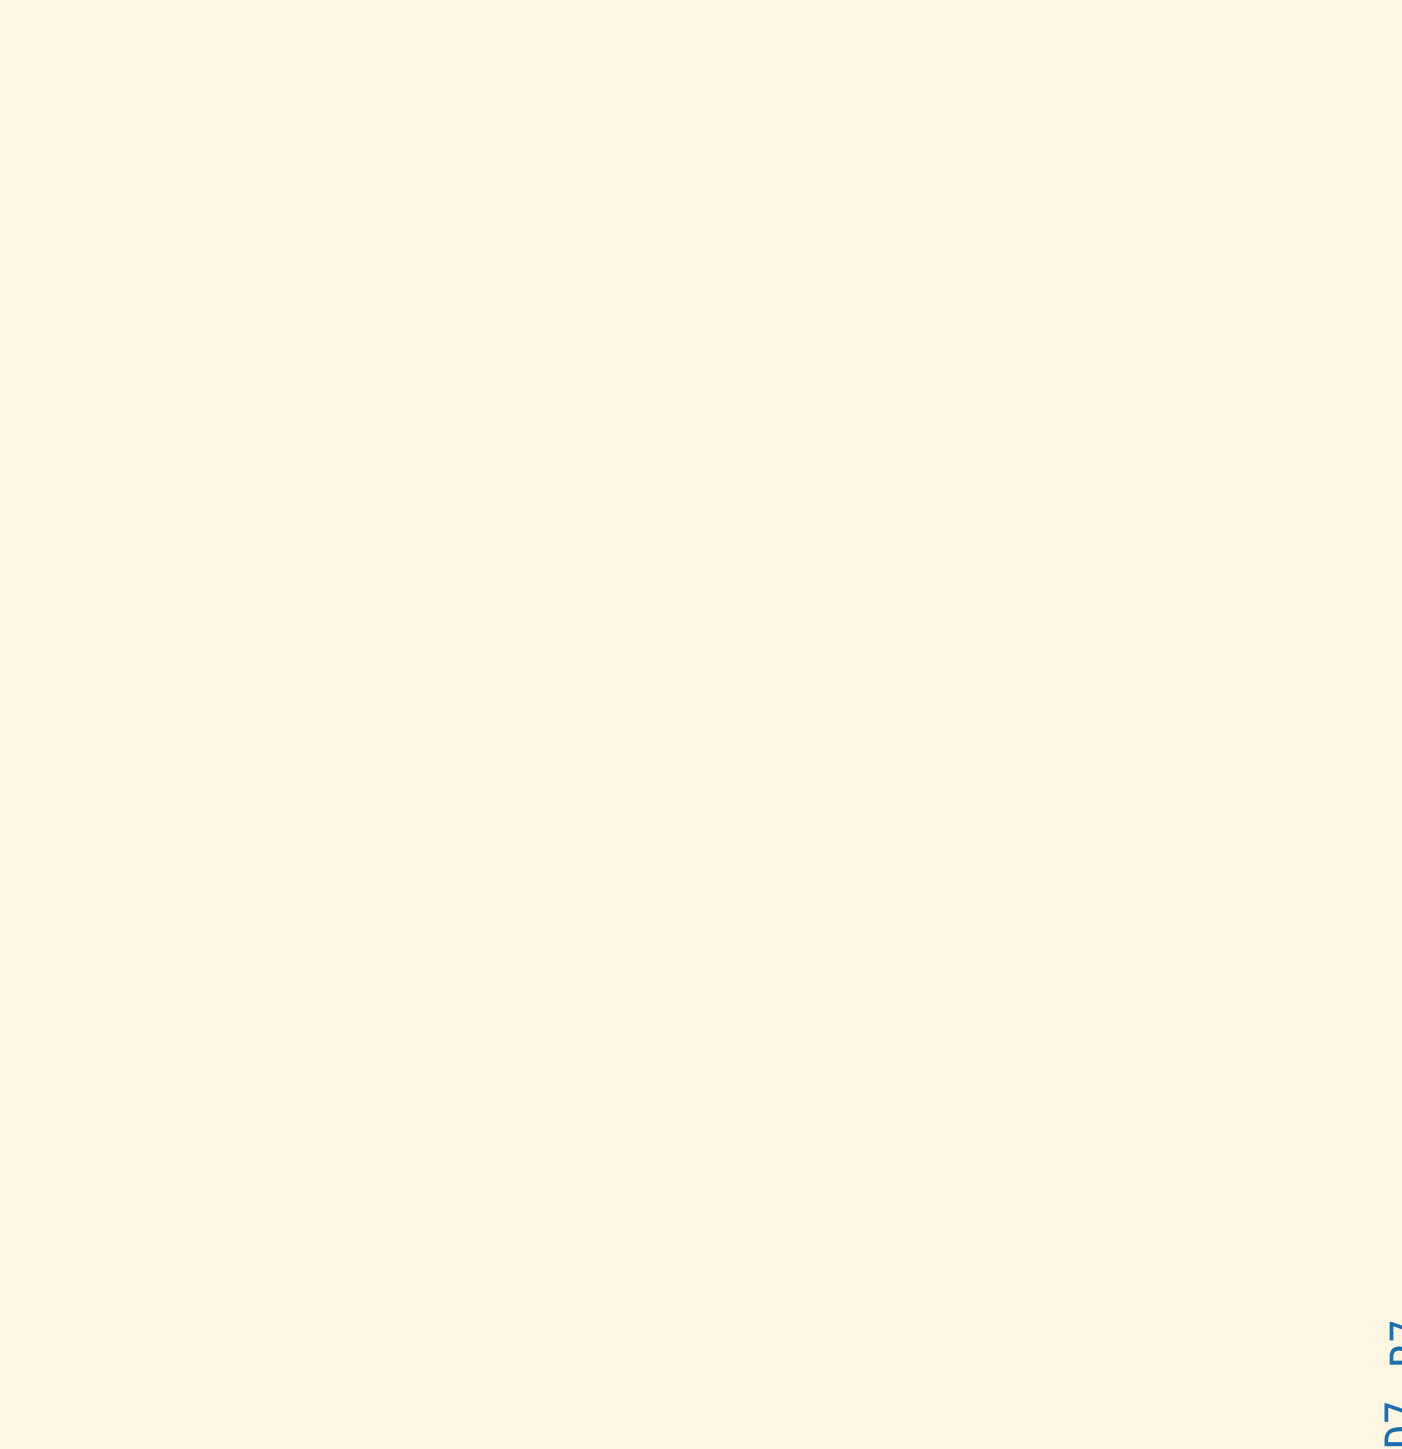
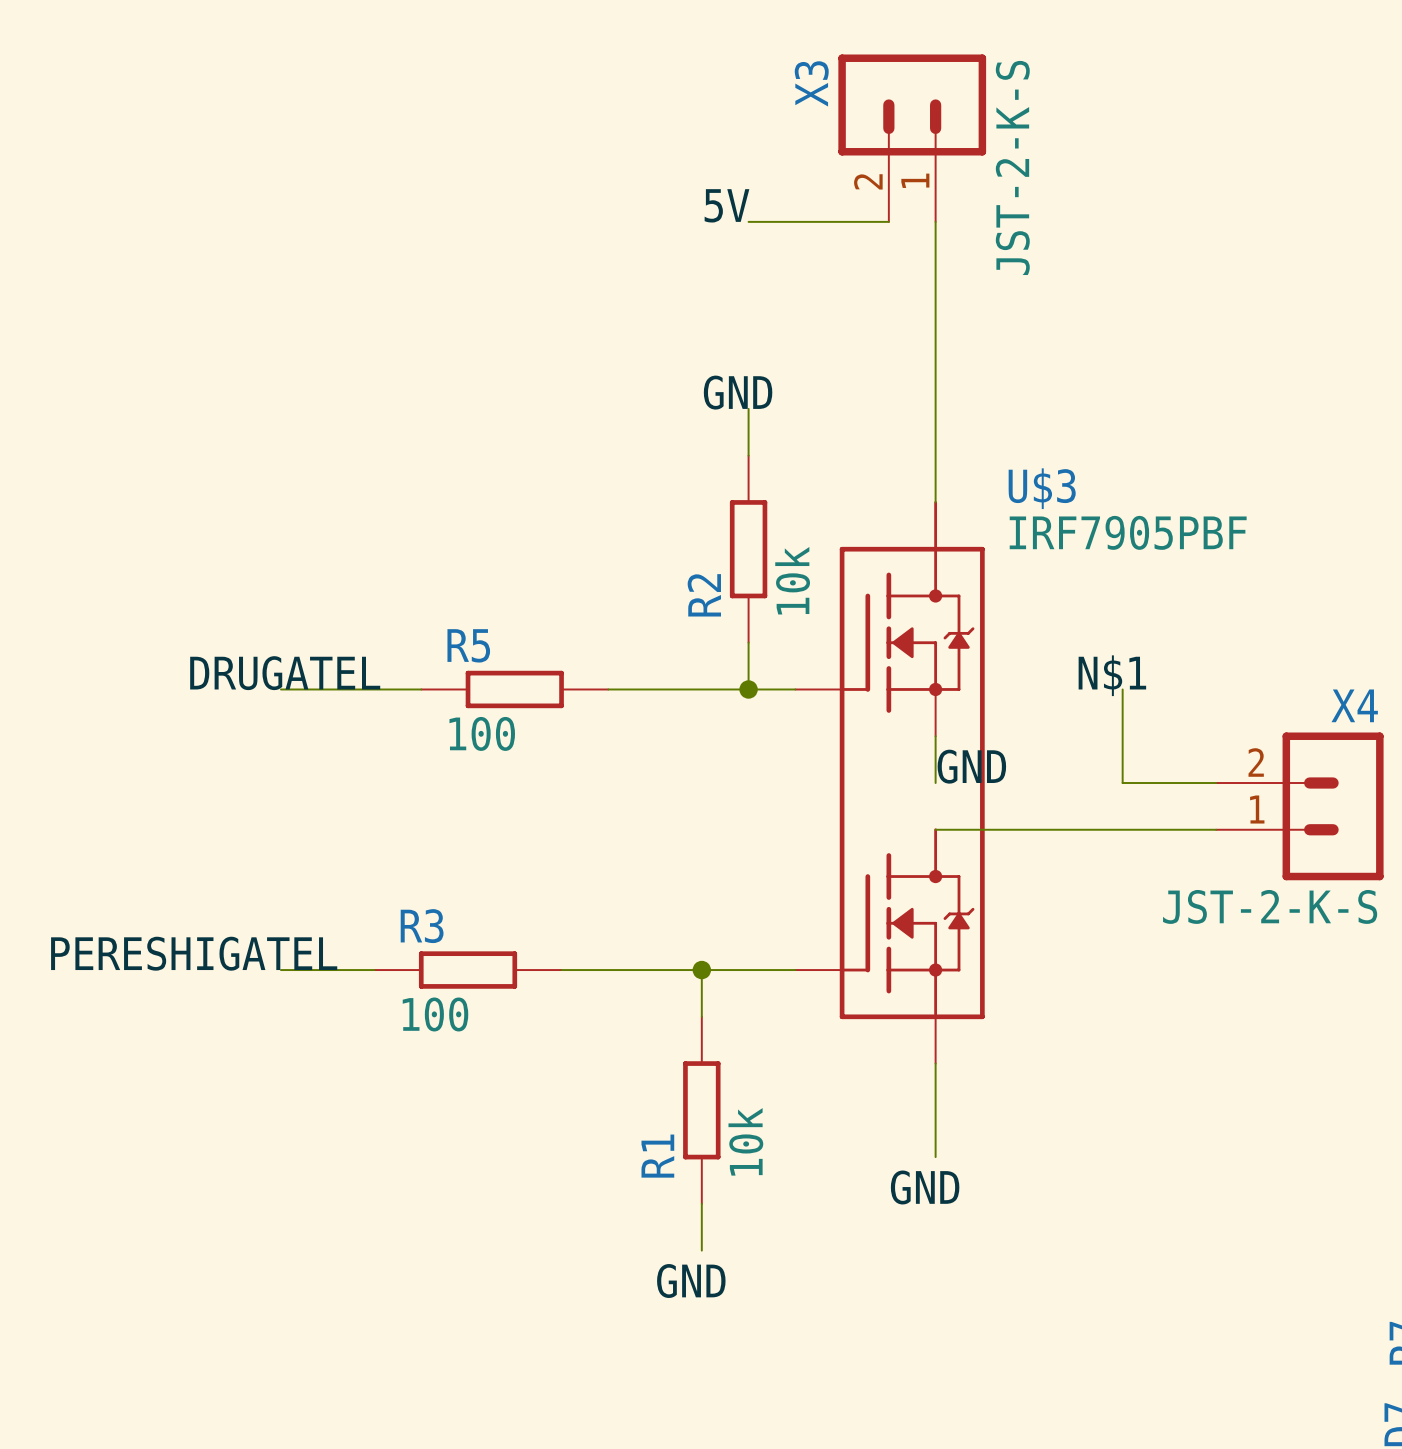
X3: none -> JST-2-K-S (912, 138)
label: none -> 5V (726, 205)
wire: none -> (748, 221) (888, 221)
wire: none -> (935, 221) (935, 502)
label: none -> GND (738, 392)
wire: none -> (748, 408) (748, 455)
R2: none -> 10k (748, 549)
wire: none -> (748, 642) (748, 689)
label: none -> DRUGATEL (285, 673)
label: none -> N$1 (1112, 675)
wire: none -> (280, 689) (421, 689)
R5: none -> 100 (514, 689)
wire: none -> (608, 689) (795, 689)
junction: none -> (748, 689)
wire: none -> (1122, 689) (1122, 783) (1216, 783)
wire: none -> (935, 736) (935, 783)
label: none -> GND (971, 766)
U$3: none -> IRF7905PBF (890, 782)
X4: none -> JST-2-K-S (1299, 806)
wire: none -> (935, 829) (1216, 829)
label: none -> PERESHIGATEL (194, 953)
wire: none -> (280, 970) (374, 970)
R3: none -> 100 (468, 970)
wire: none -> (561, 970) (795, 970)
wire: none -> (701, 970) (701, 1016)
junction: none -> (701, 970)
wire: none -> (935, 1063) (935, 1157)
R1: none -> 10k (701, 1110)
label: none -> GND (925, 1187)
wire: none -> (701, 1203) (701, 1250)
label: none -> GND (691, 1281)

